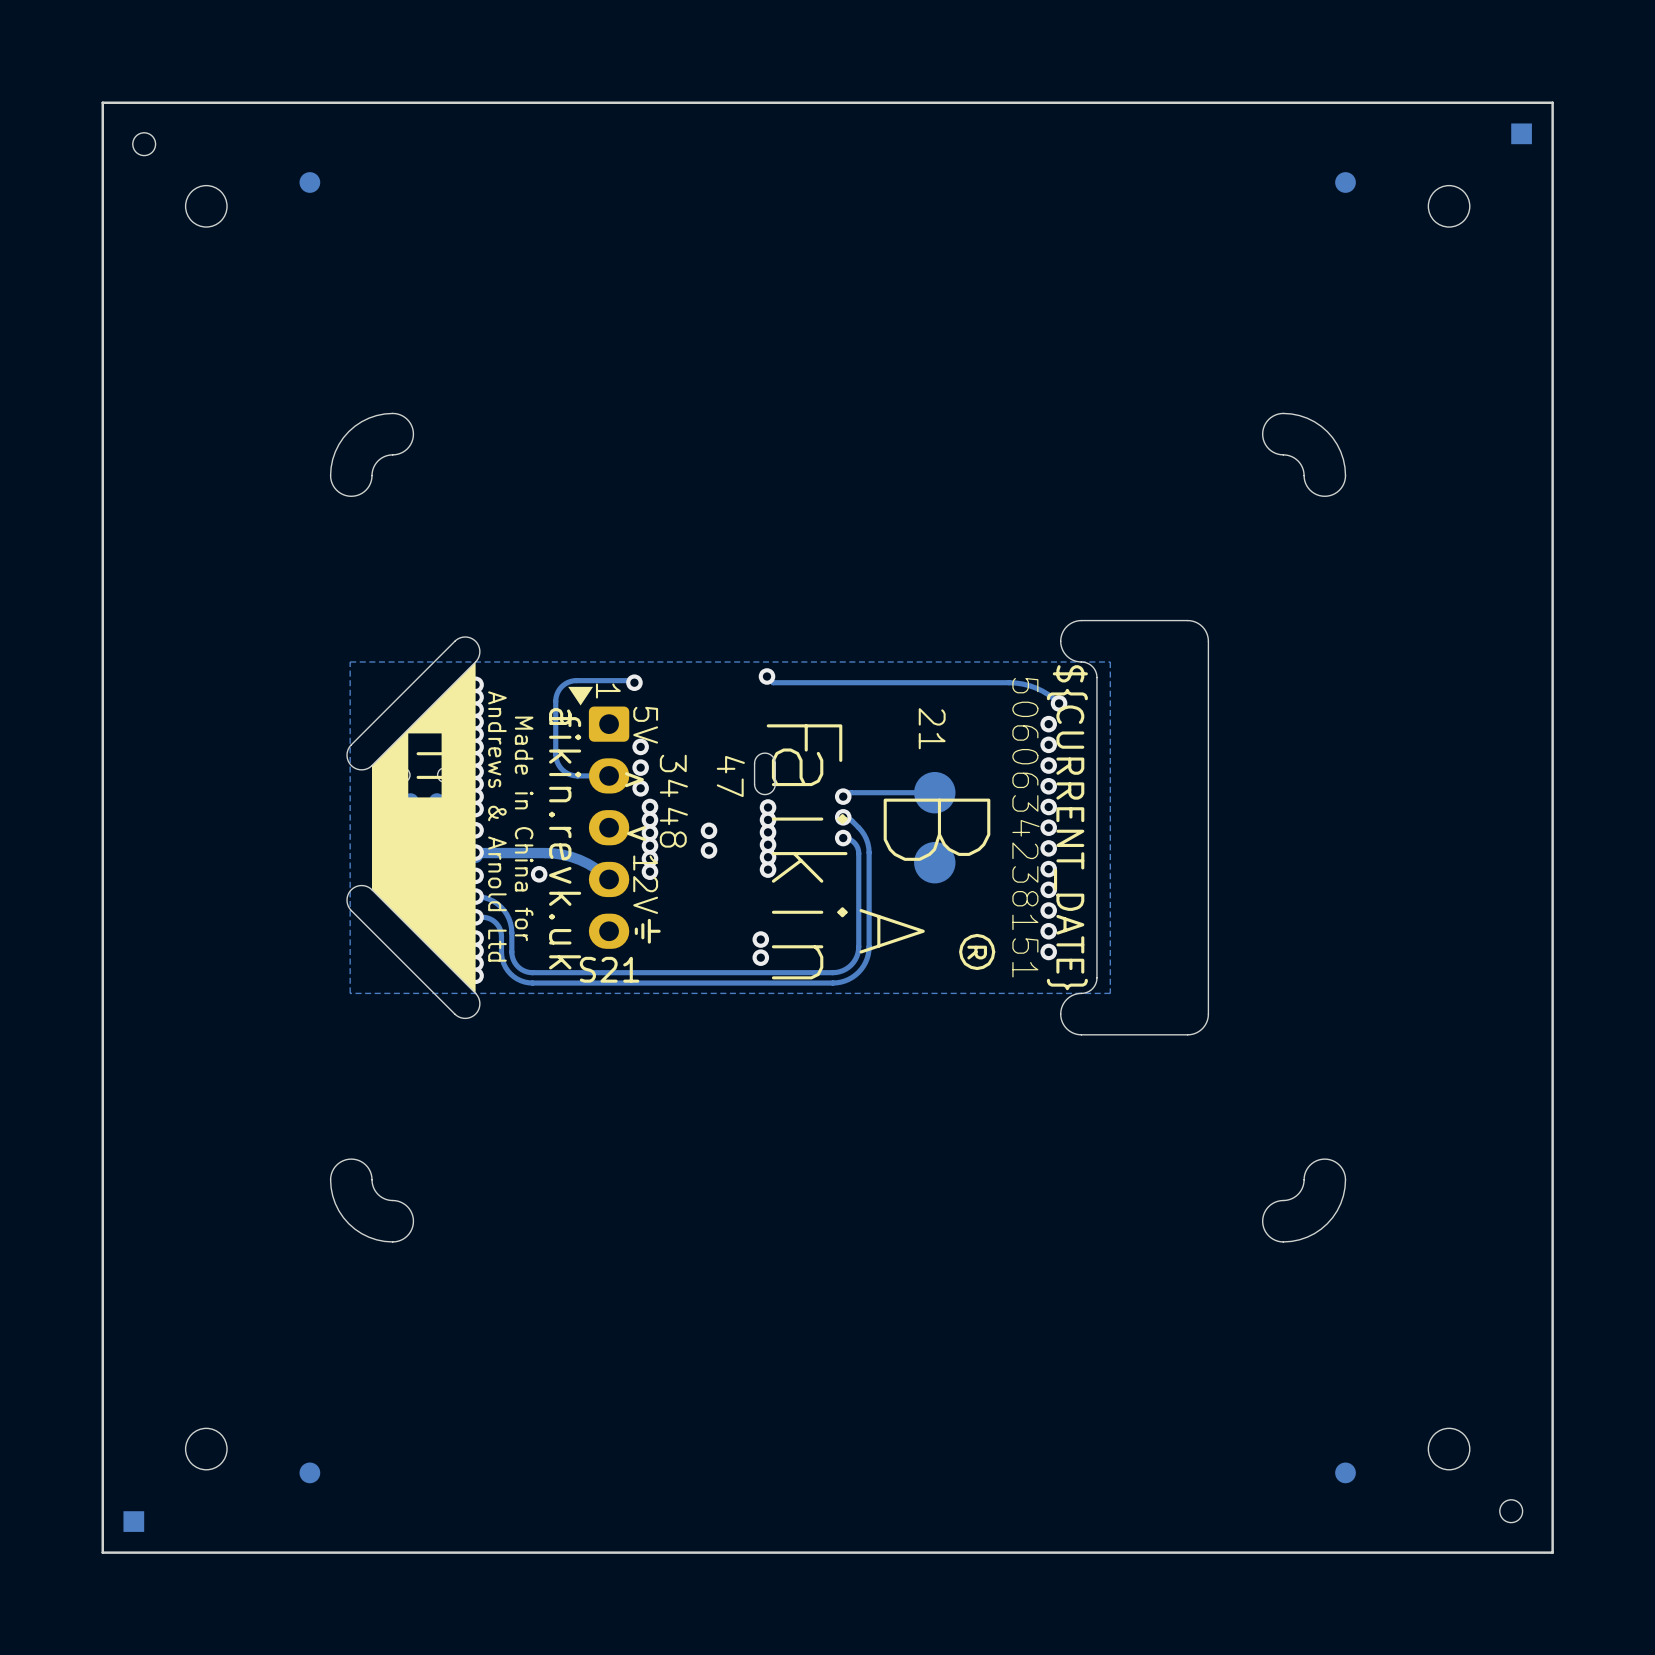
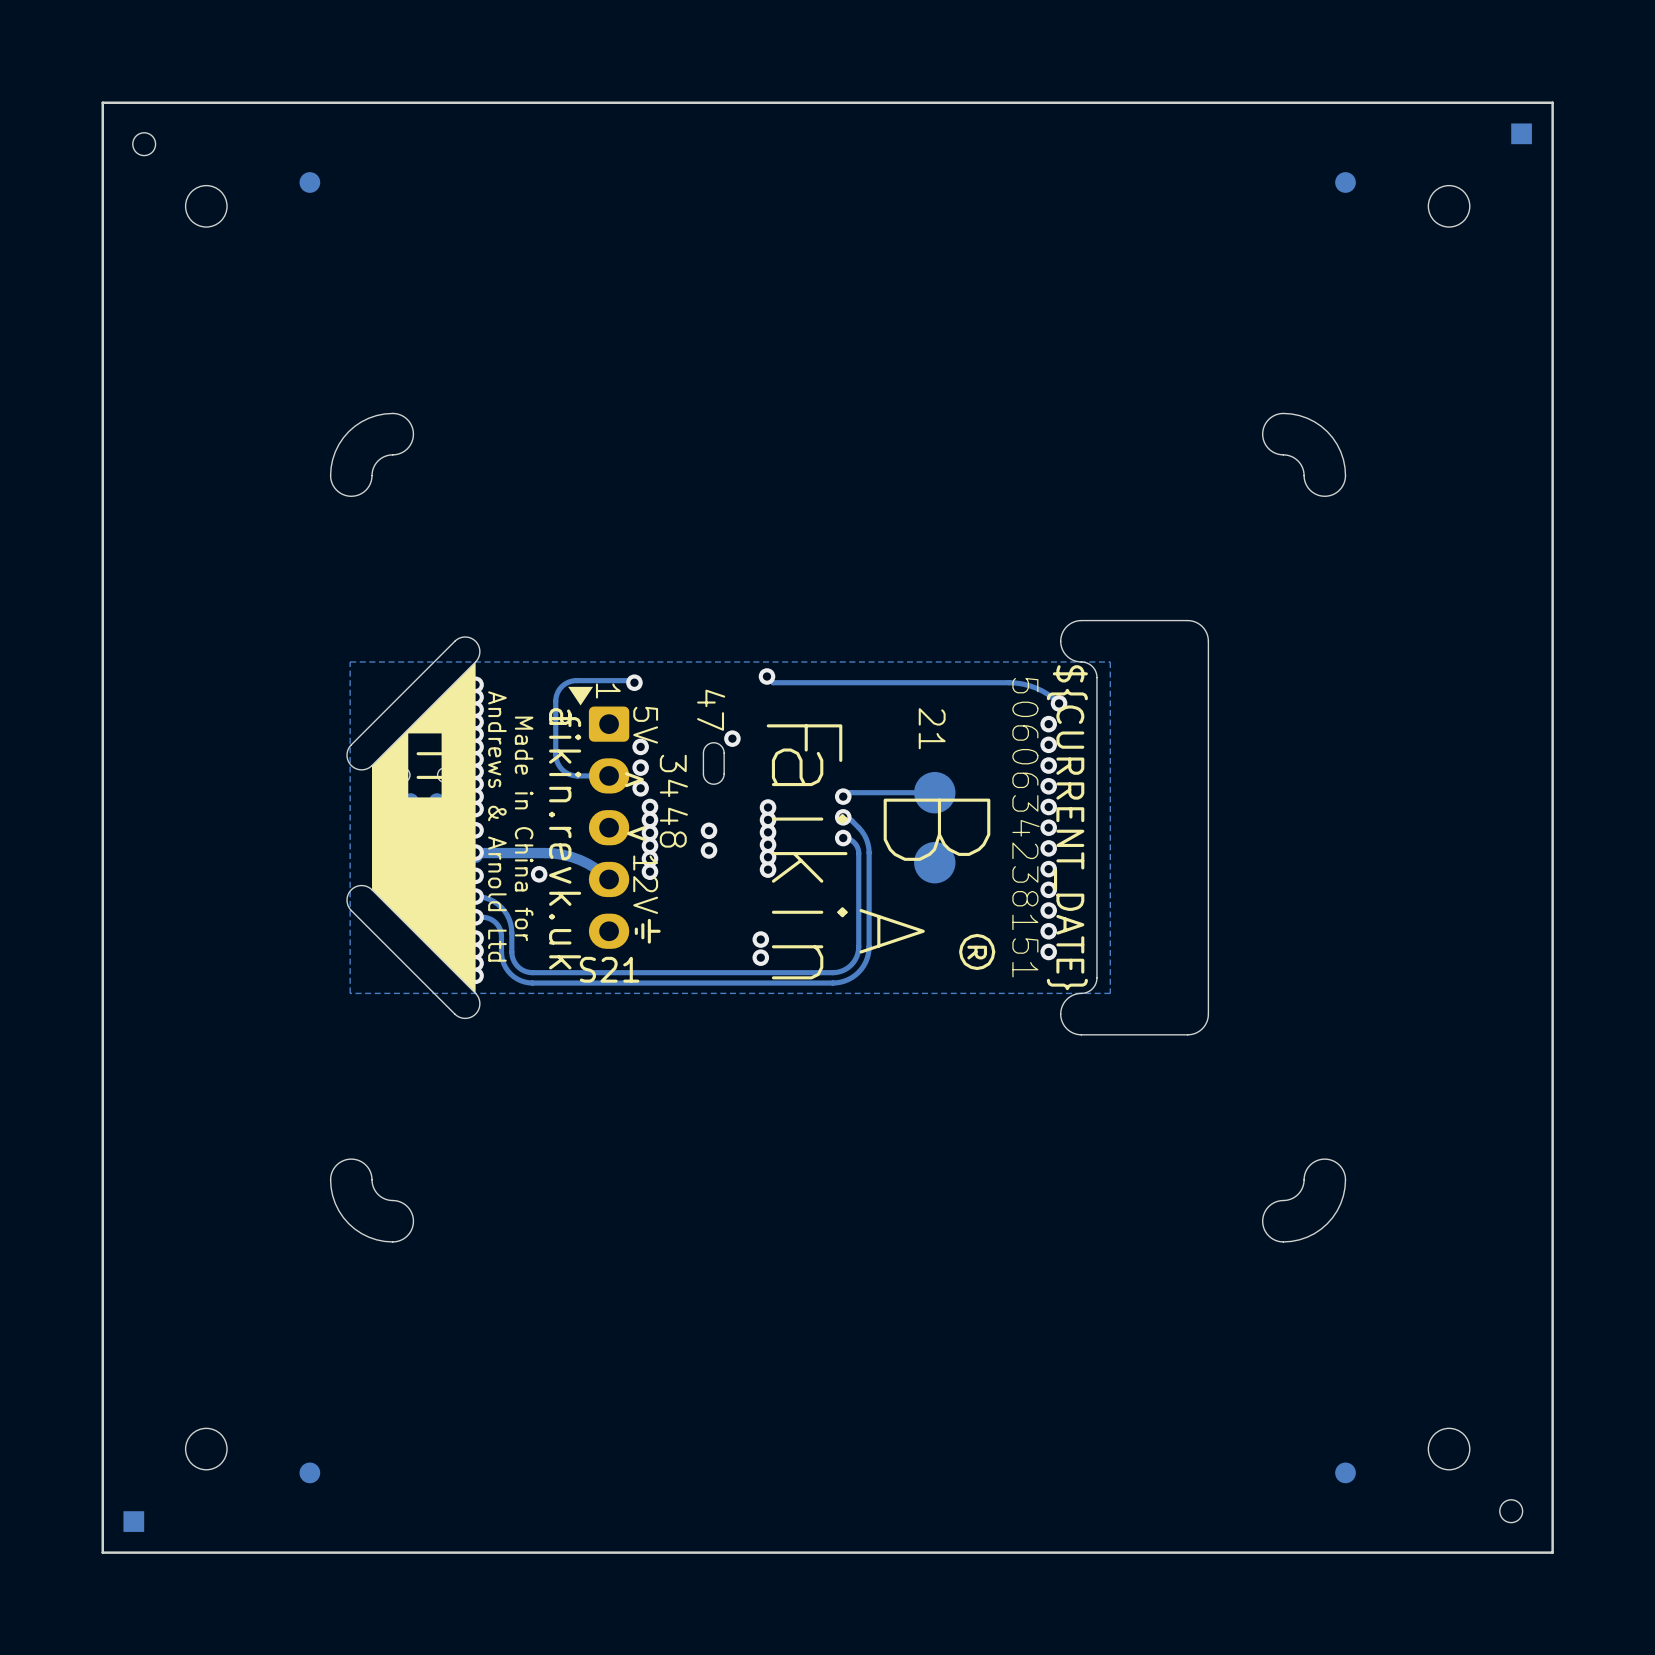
via: none -> (732, 738)
board edge: (775, 763) (774, 789) (768, 793) (760, 793) (754, 785) (755, 758) (760, 754) (767, 753) (772, 756) (775, 763) -> (724, 753) (722, 778) (717, 783) (708, 783) (703, 775) (704, 748) (708, 743) (716, 743) (722, 747) (724, 753)
text position: 47 (730, 776) -> 47 (711, 710)

